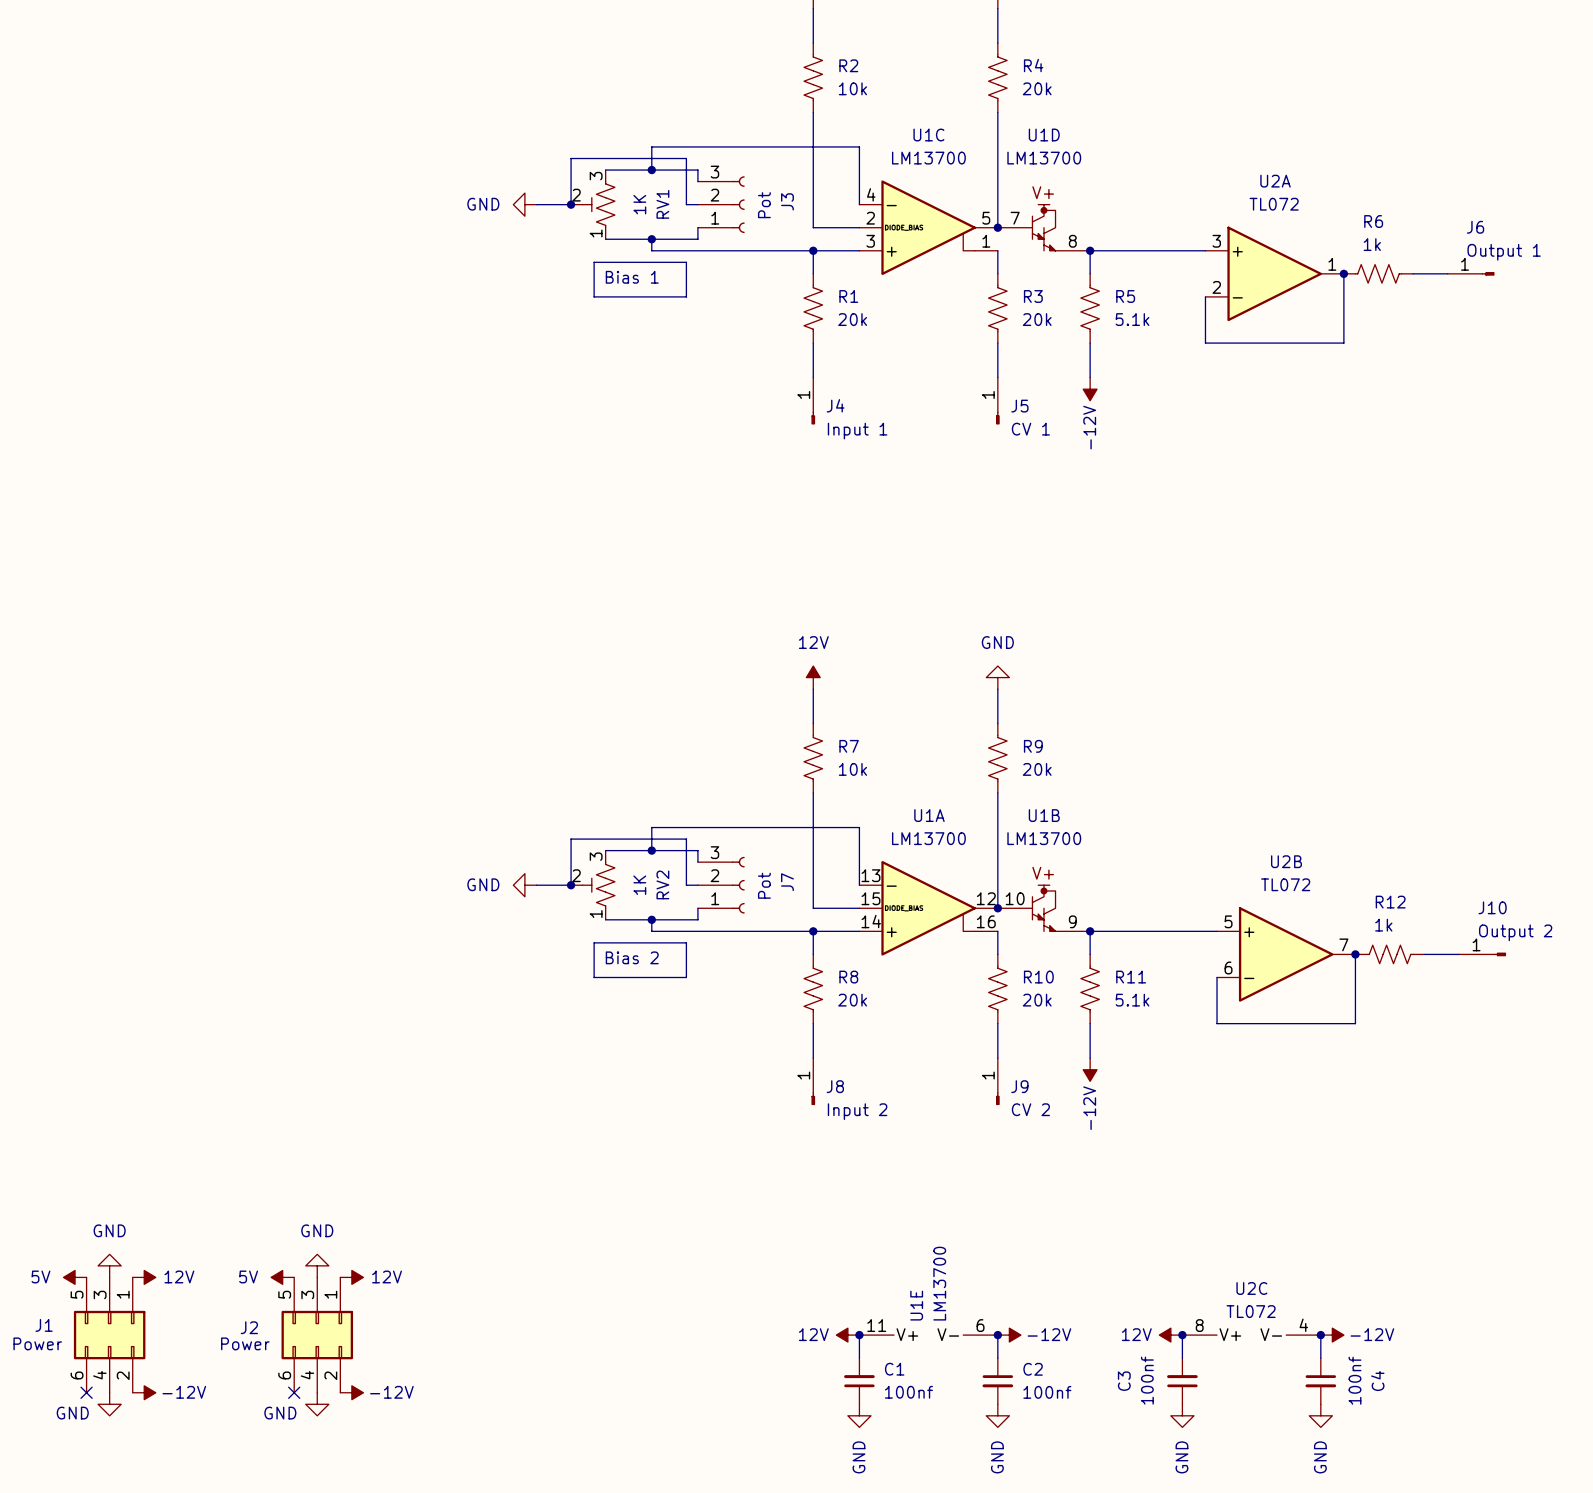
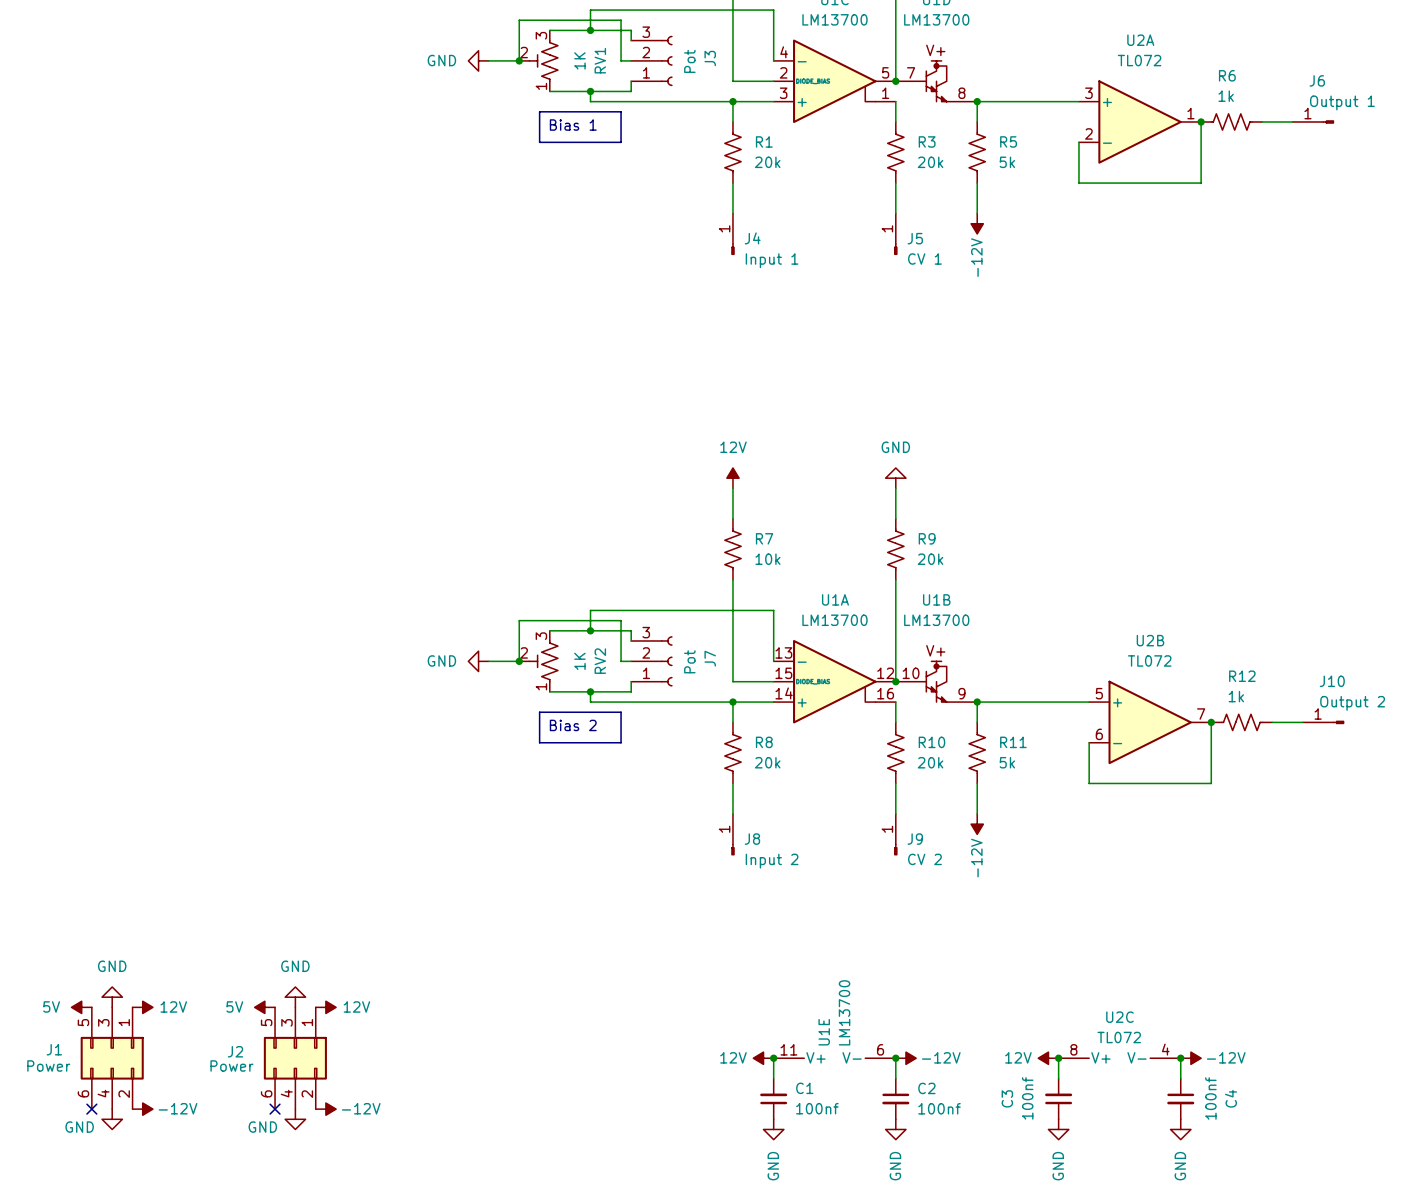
R5 value: 5.1k (1132, 319) -> 5k (1007, 162)
R11 value: 5.1k (1132, 1000) -> 5k (1007, 762)

